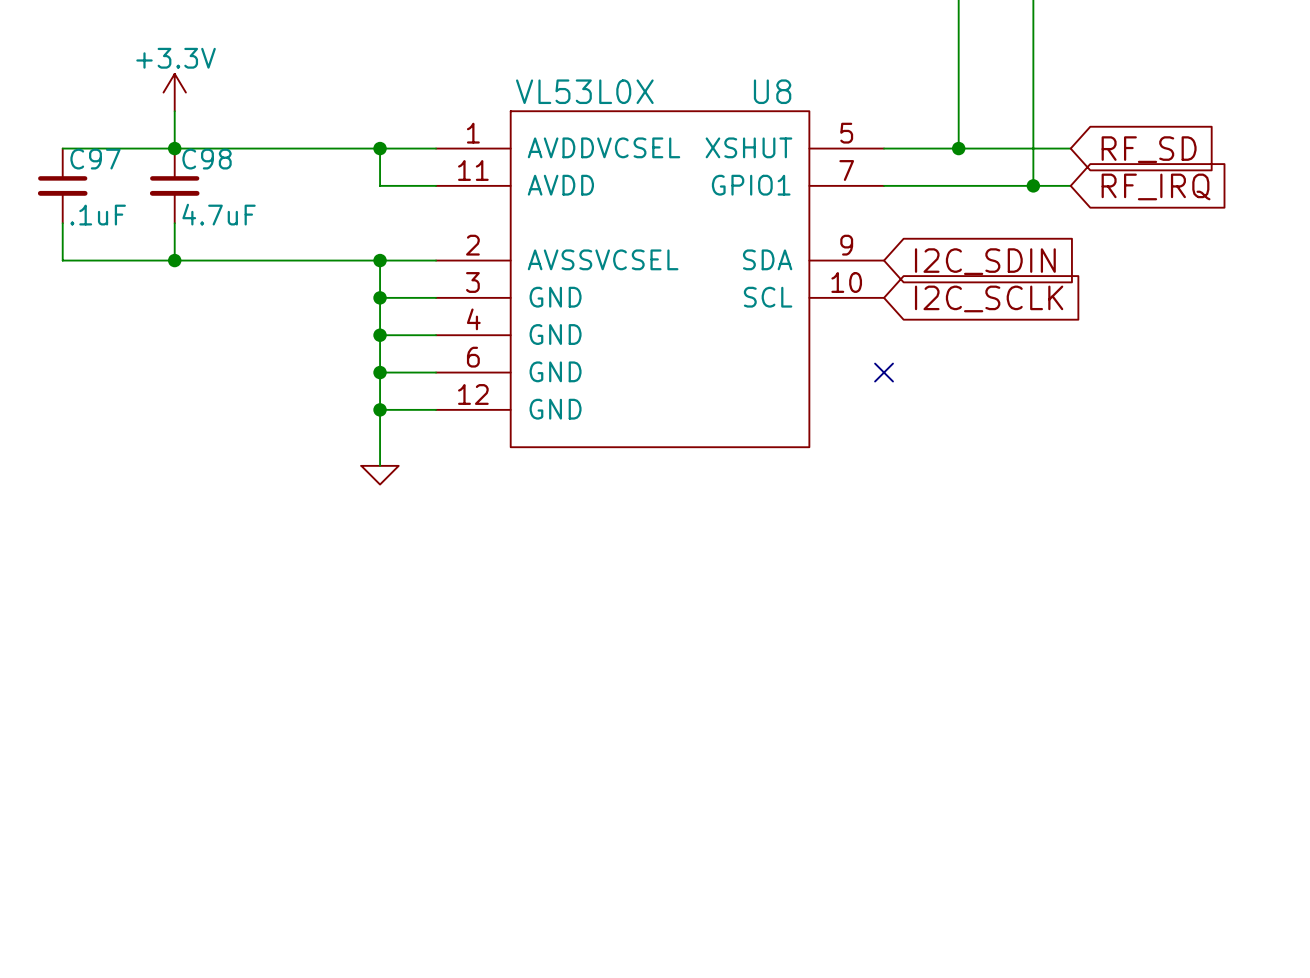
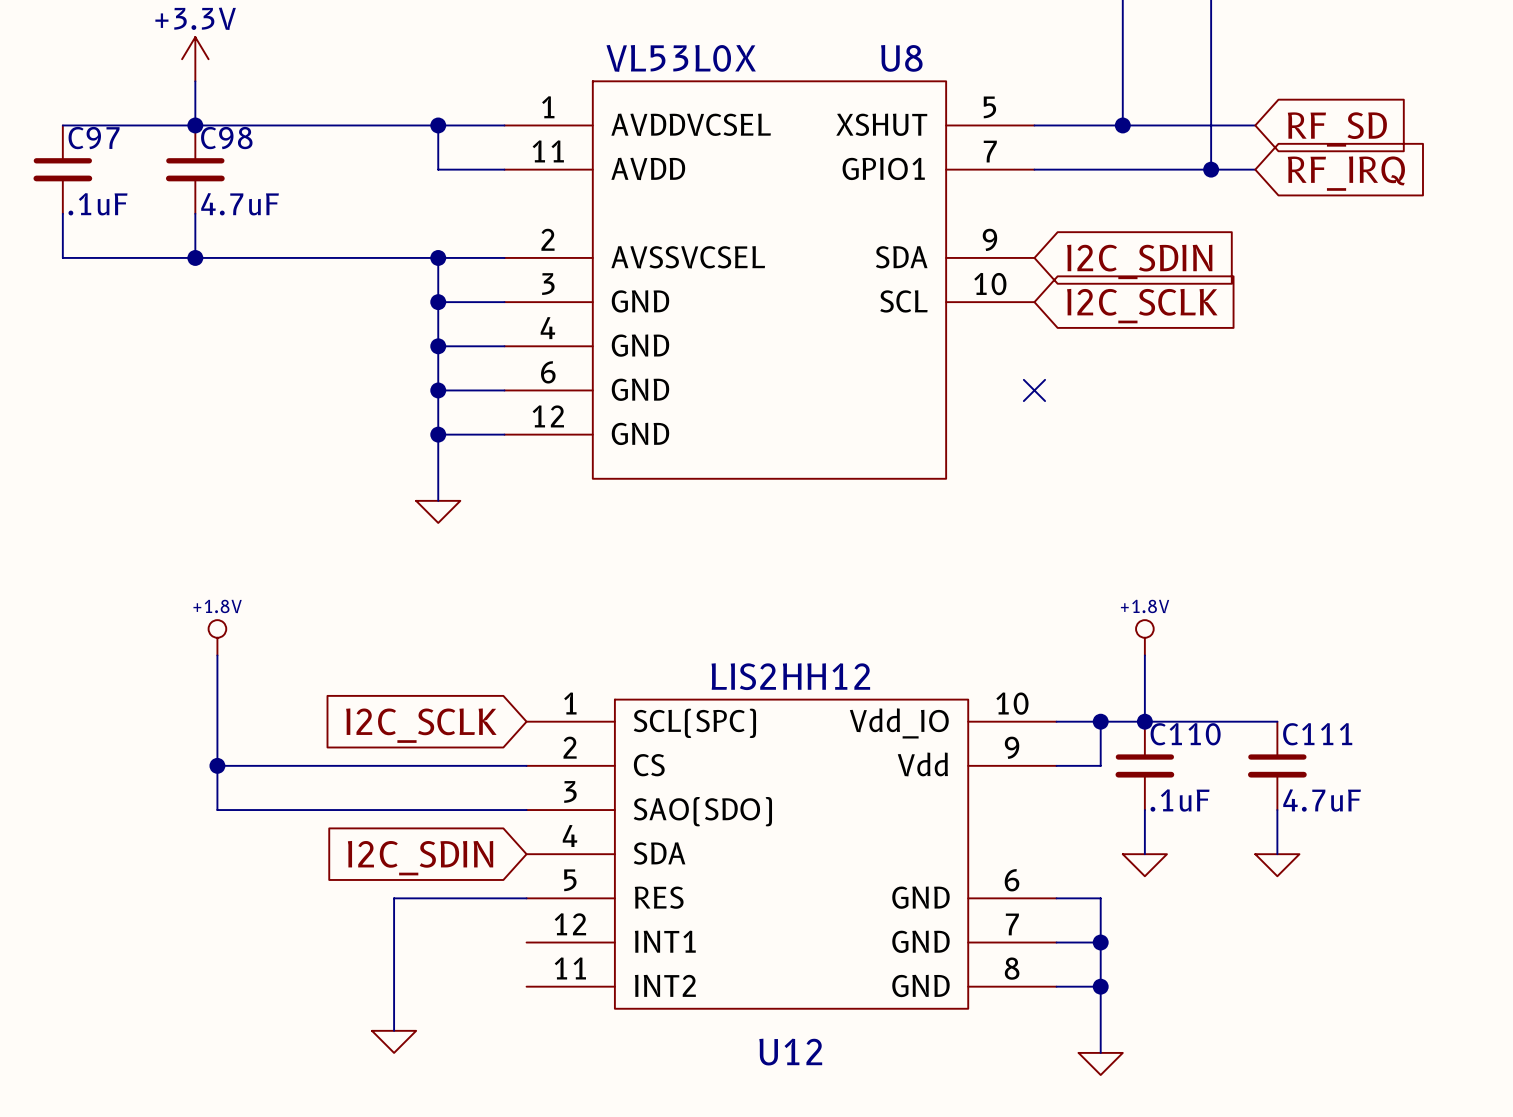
power symbol: none -> +1.8V (217, 637)
power symbol: none -> +1.8V (1144, 637)
wire: none -> (217, 655) (217, 810) (526, 810)
wire: none -> (1144, 655) (1144, 721)
wire: none -> (1056, 721) (1277, 721)
wire: none -> (1100, 721) (1100, 765) (1056, 765)
junction: none -> (1100, 721)
junction: none -> (1144, 721)
global label: none -> I2C_SCLK (421, 725)
wire: none -> (217, 765) (526, 765)
junction: none -> (217, 765)
C110: none -> .1uF (1144, 765)
C111: none -> 4.7uF (1277, 765)
wire: none -> (1144, 810) (1144, 854)
wire: none -> (1277, 810) (1277, 854)
U12: none -> LIS2HH12 (791, 854)
global label: none -> I2C_SDIN (420, 858)
power symbol: none -> (1144, 865)
power symbol: none -> (1277, 865)
wire: none -> (526, 898) (394, 898) (394, 1030)
wire: none -> (1056, 898) (1100, 898) (1100, 1052)
wire: none -> (1056, 942) (1100, 942)
junction: none -> (1100, 942)
wire: none -> (1056, 986) (1100, 986)
junction: none -> (1100, 986)
power symbol: none -> (394, 1041)
power symbol: none -> (1100, 1063)

